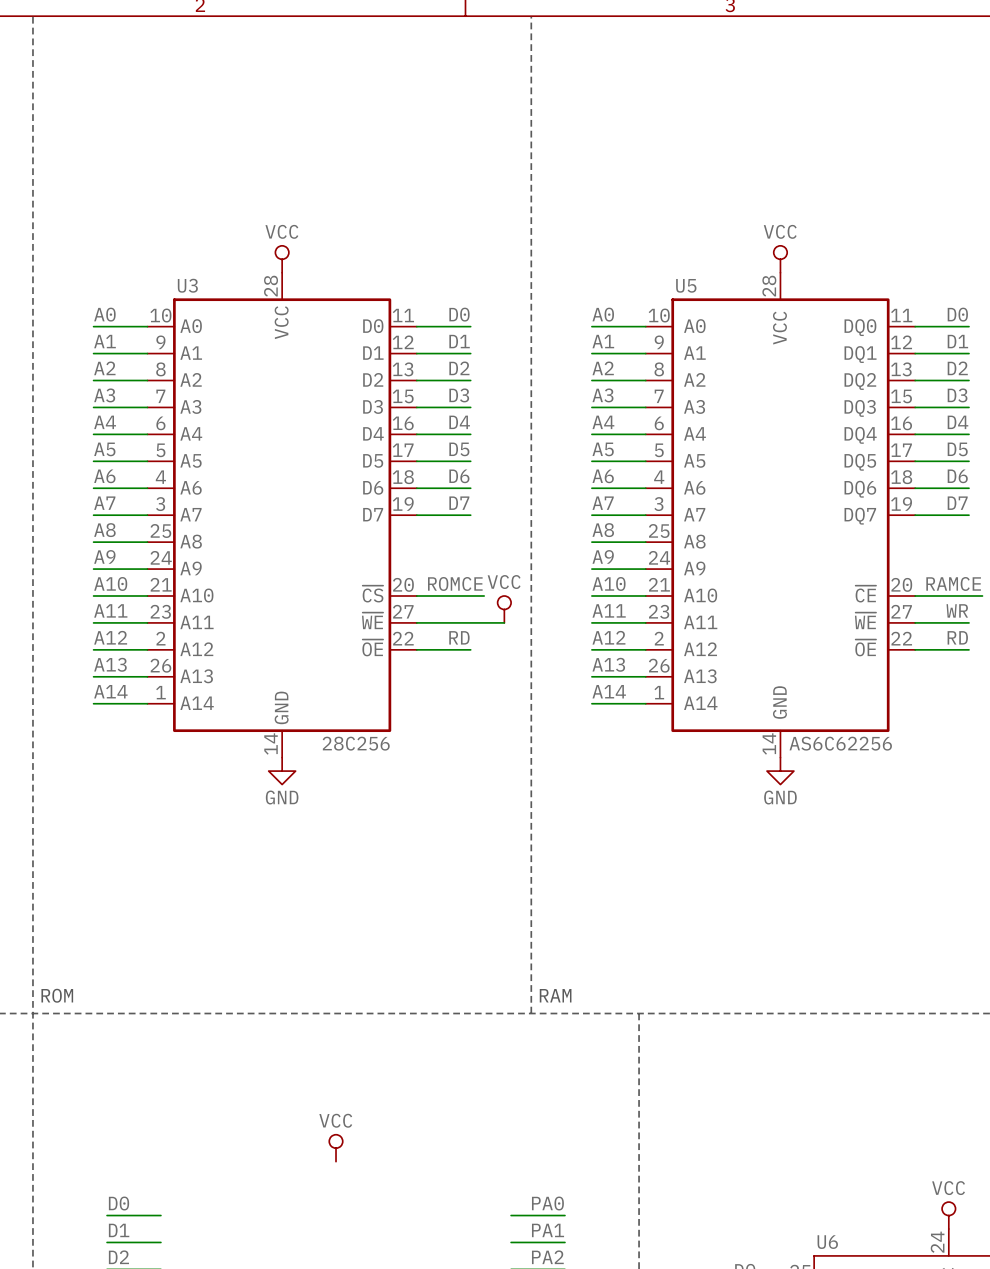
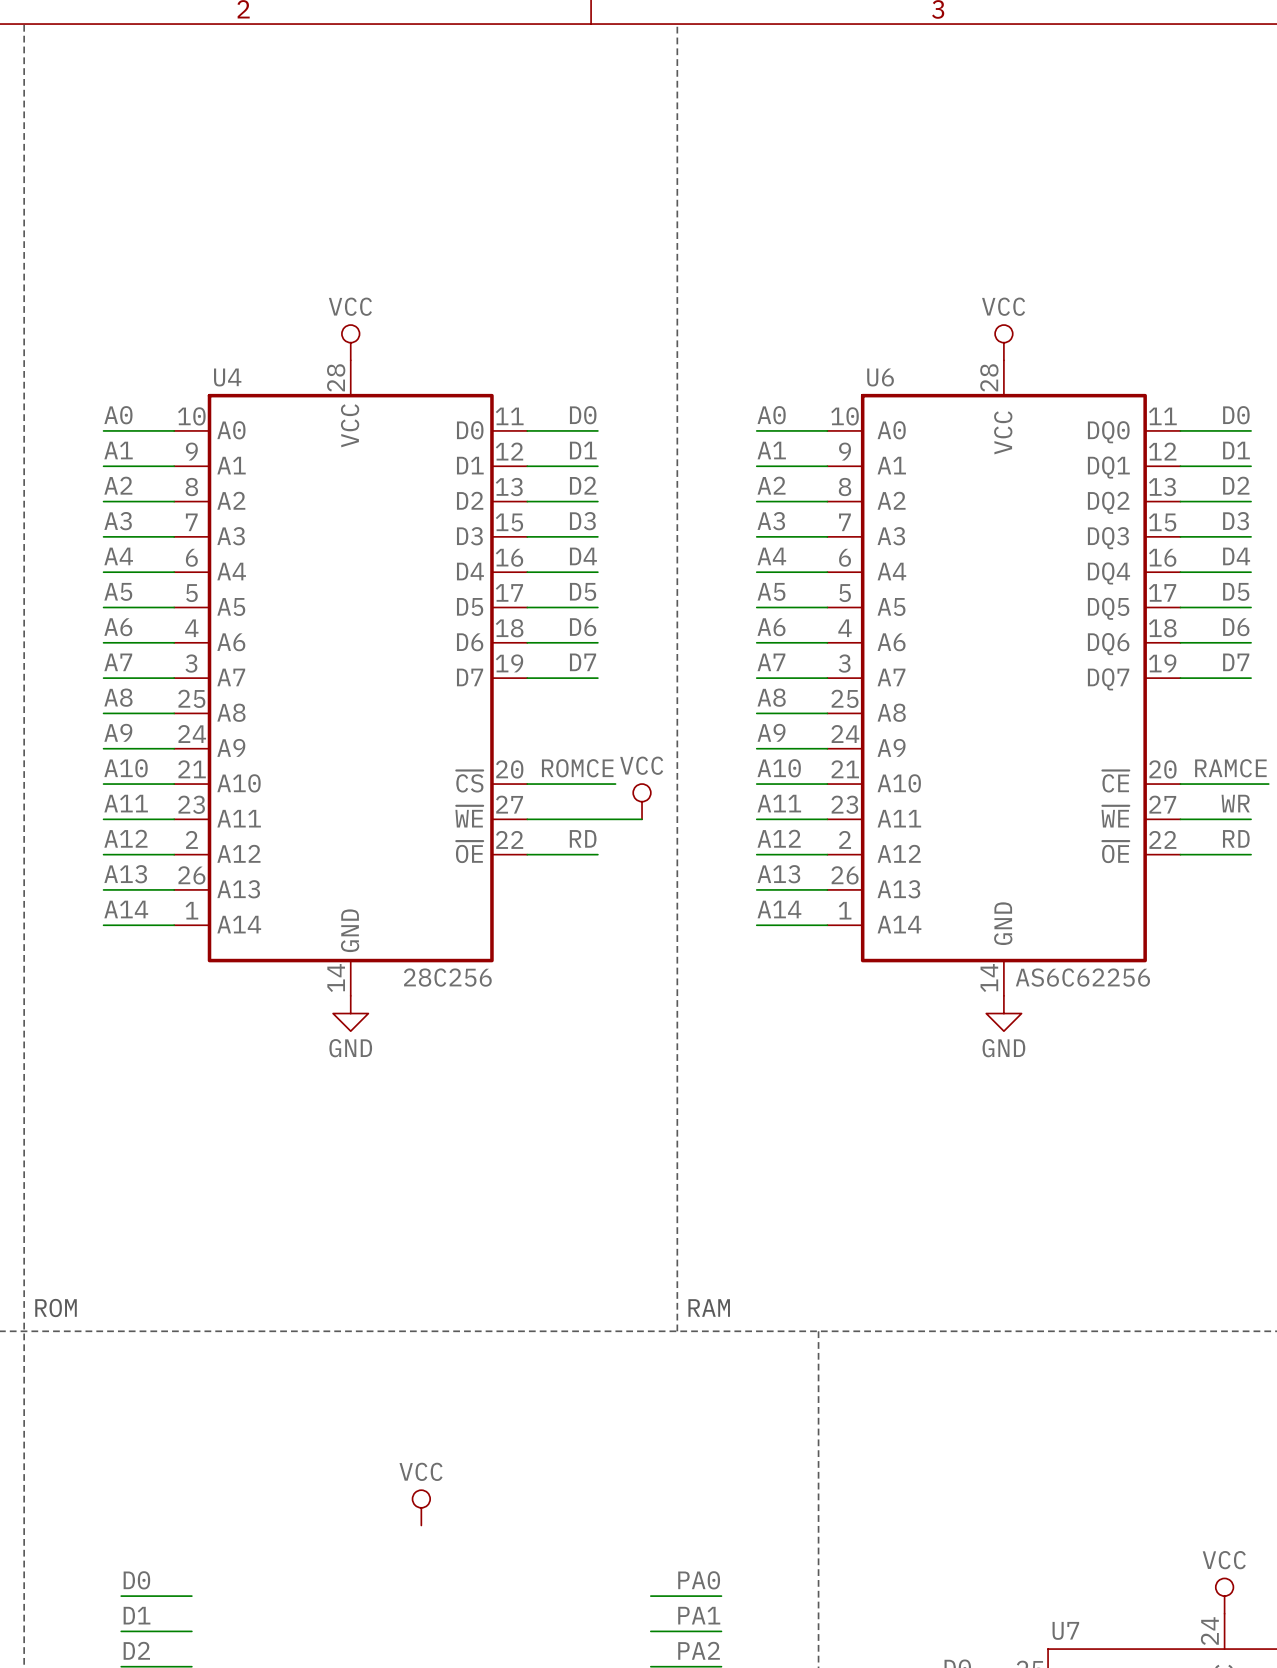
U3 name: U3 (187, 285) -> U4 (227, 377)
U5 name: U5 (686, 285) -> U6 (880, 377)
U6 name: U6 (827, 1242) -> U7 (1065, 1630)

